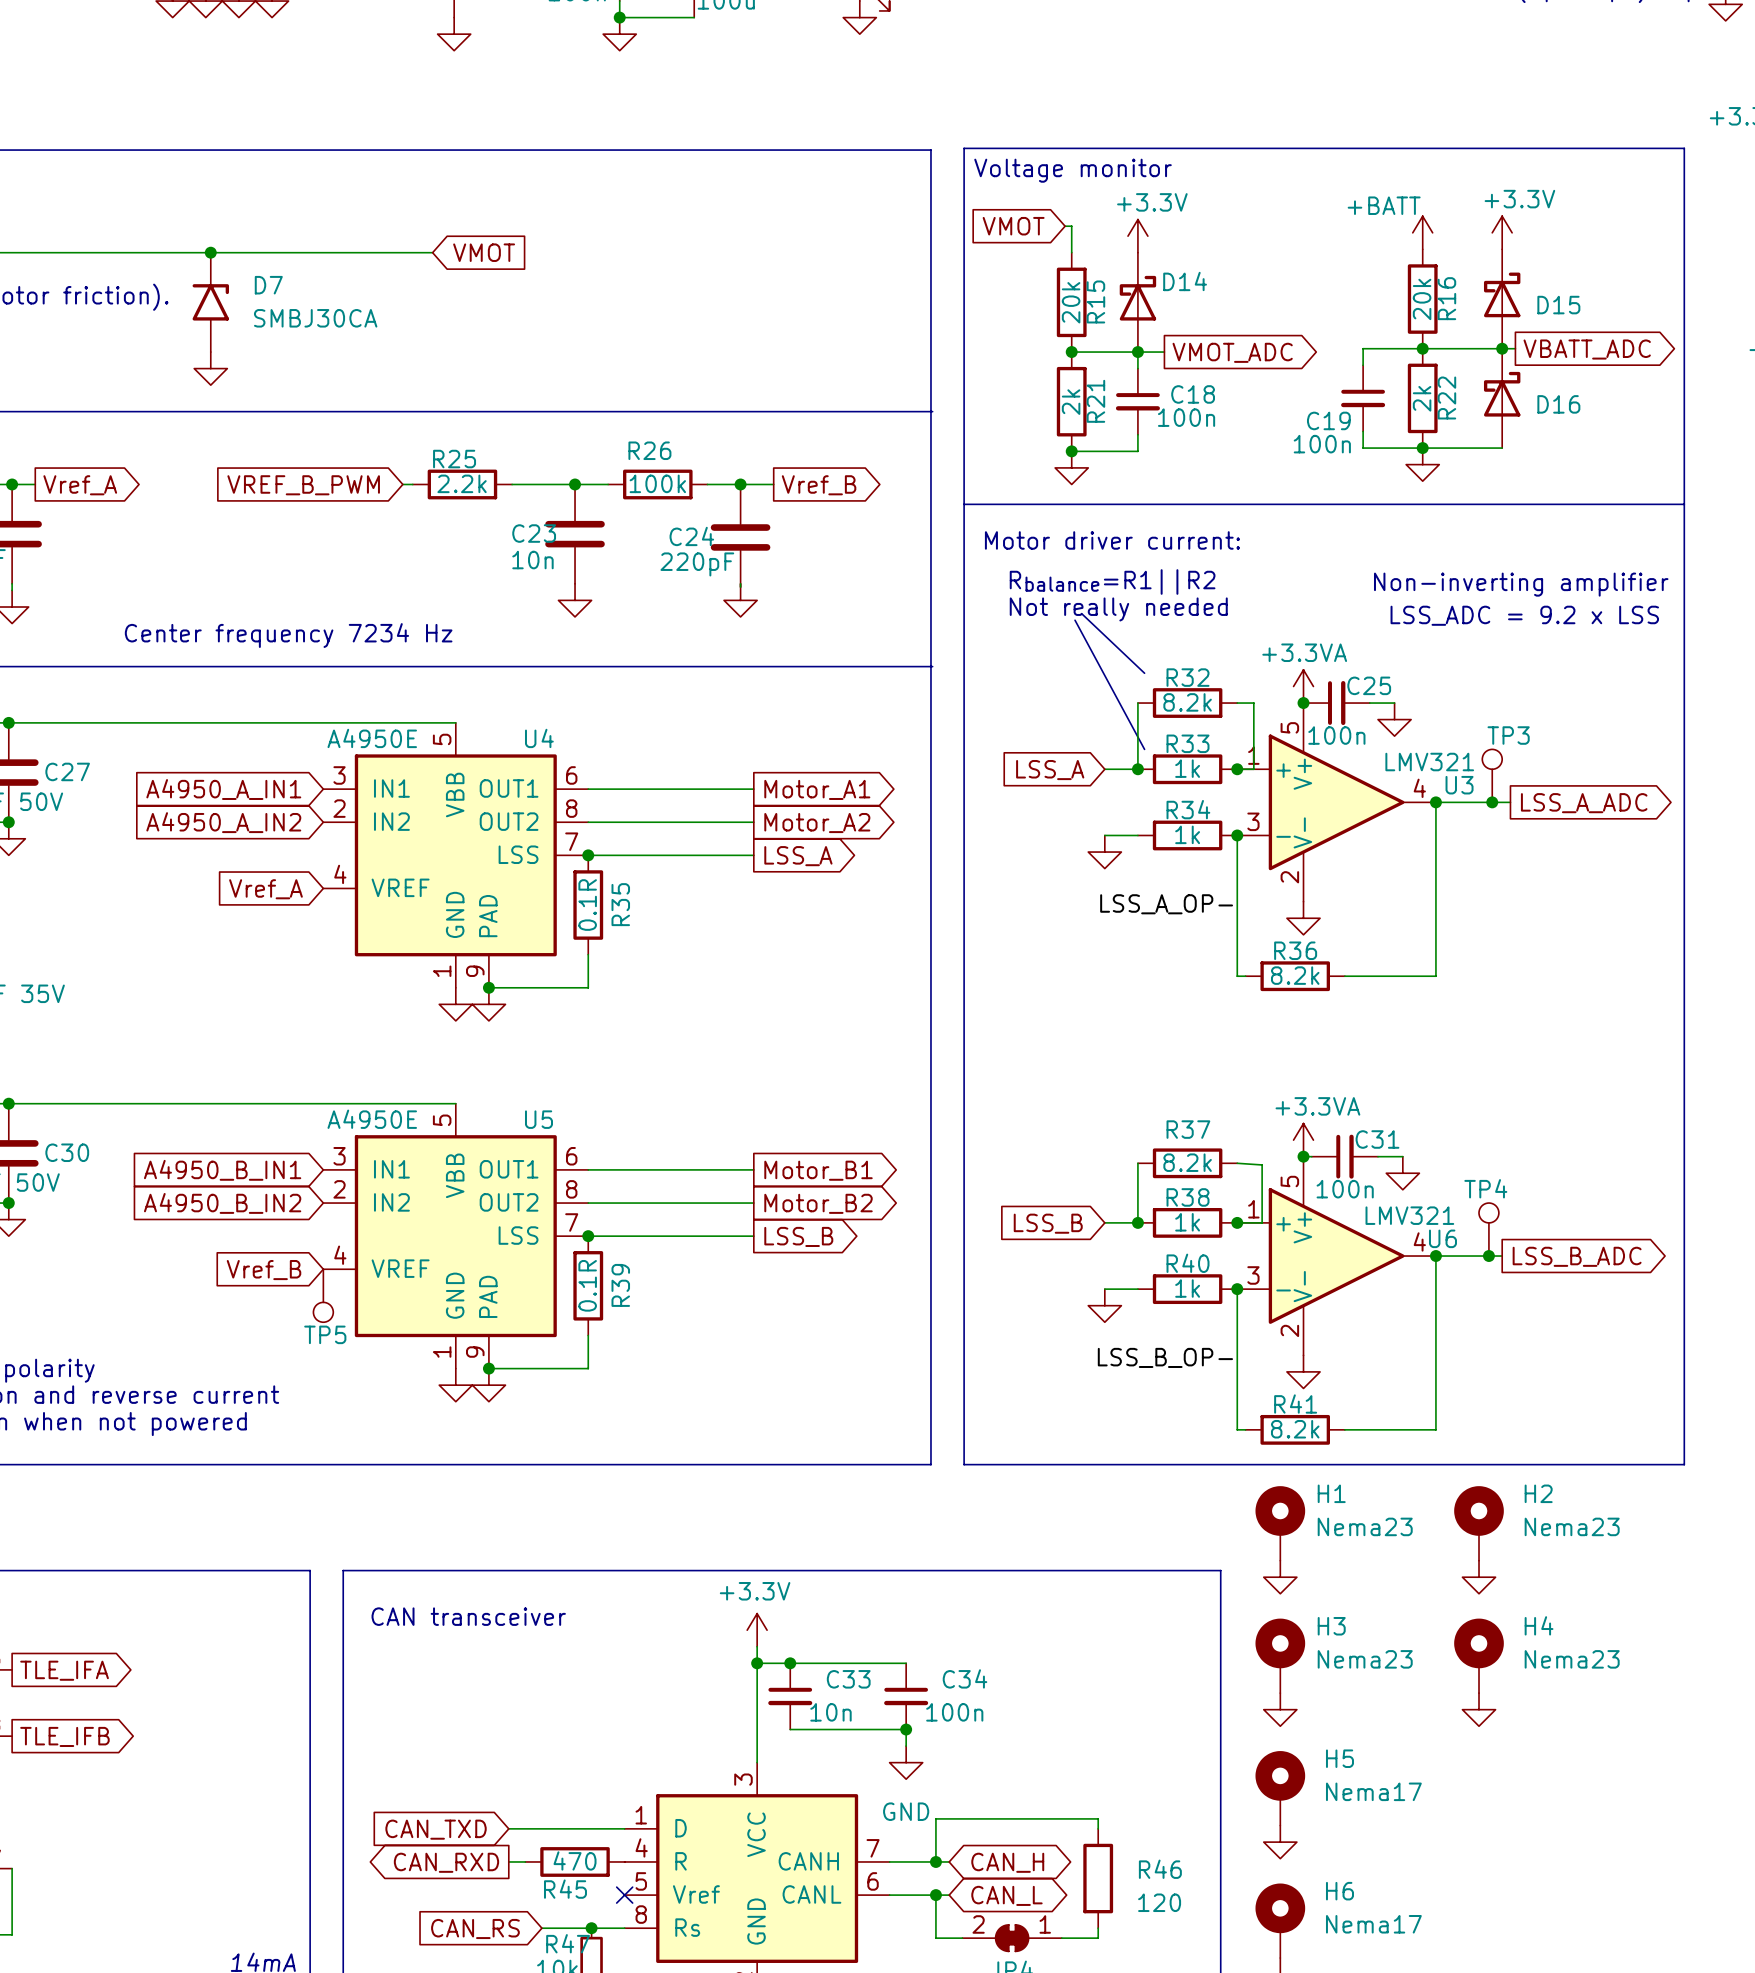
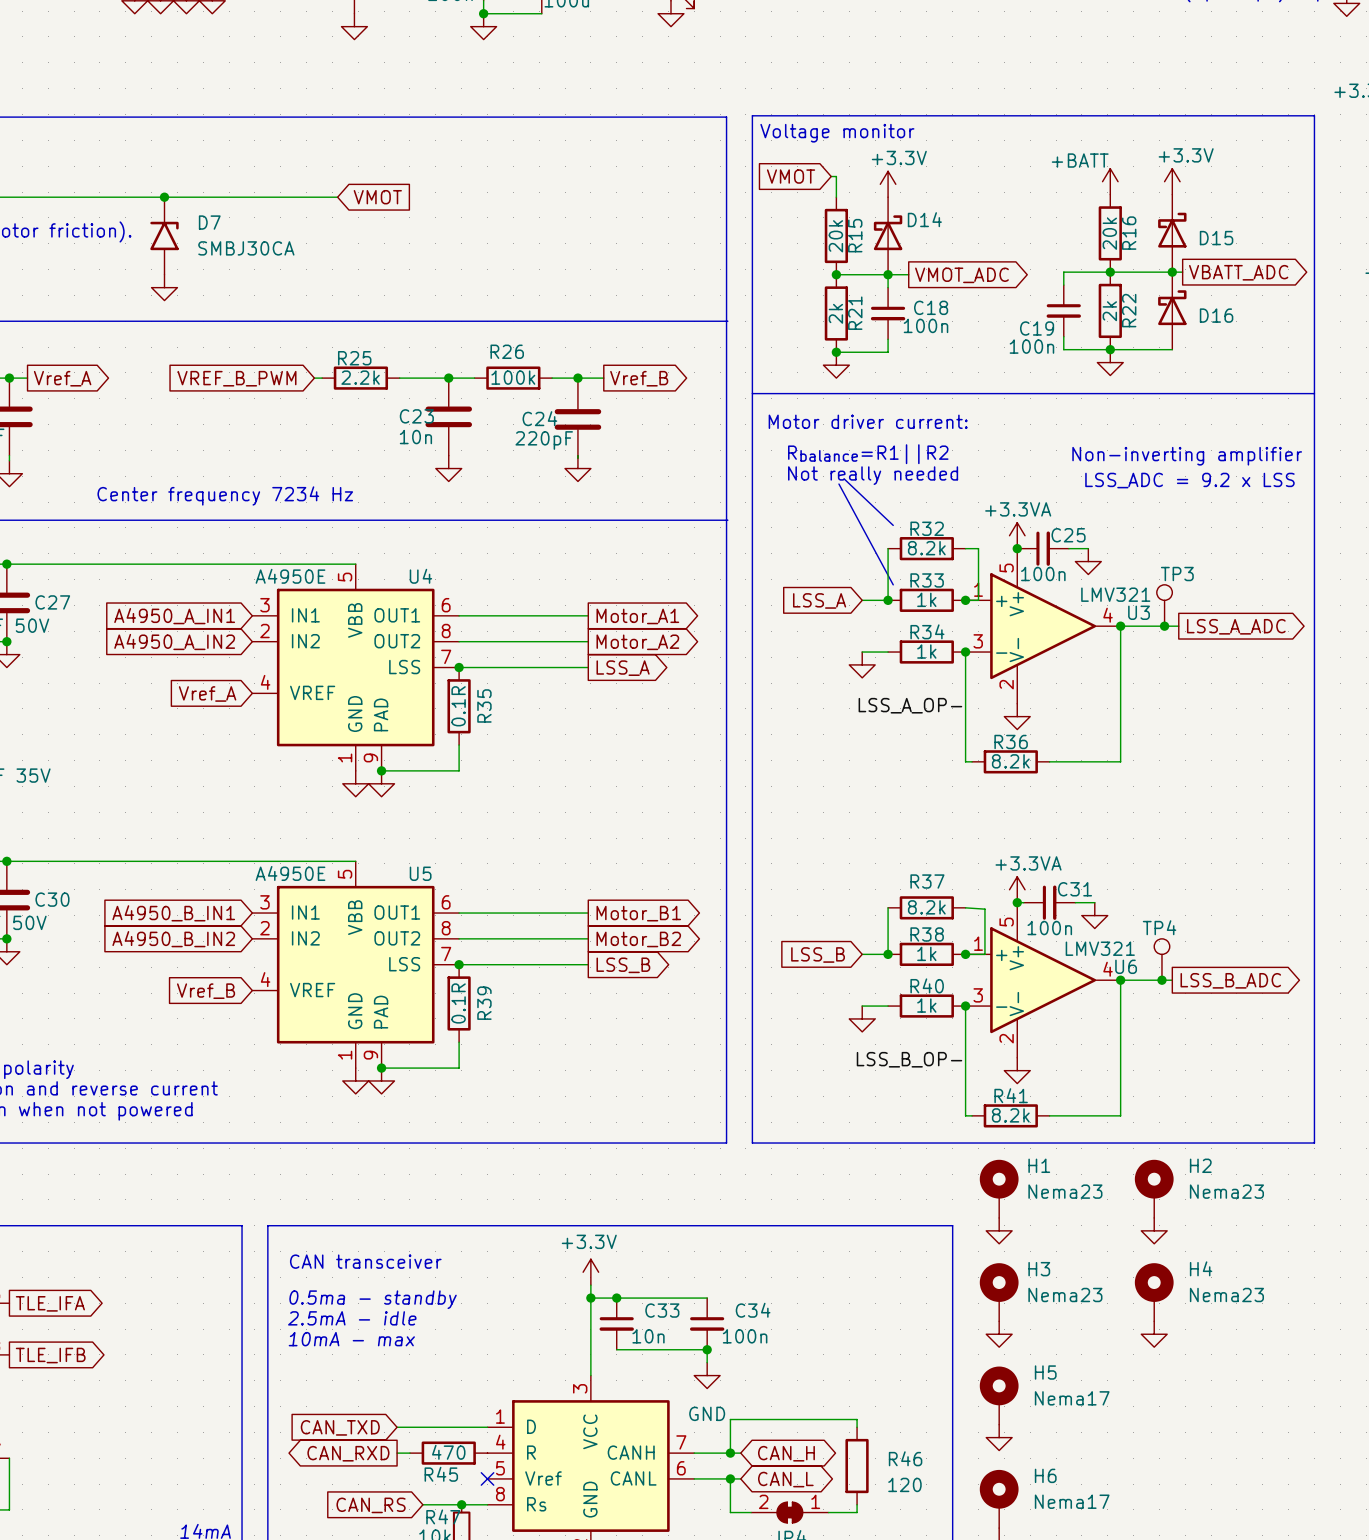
TP5: (323, 1295) -> none
text: none -> 0.5ma - standby (373, 1299)
text: none -> 2.5mA - idle (352, 1318)
text: none -> 10mA - max (351, 1339)

